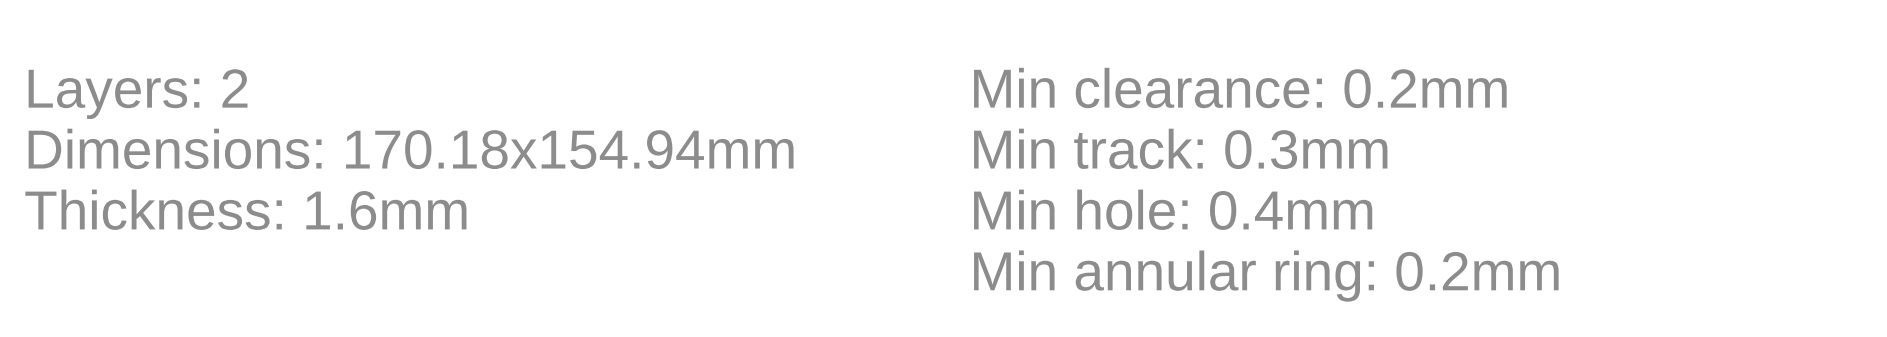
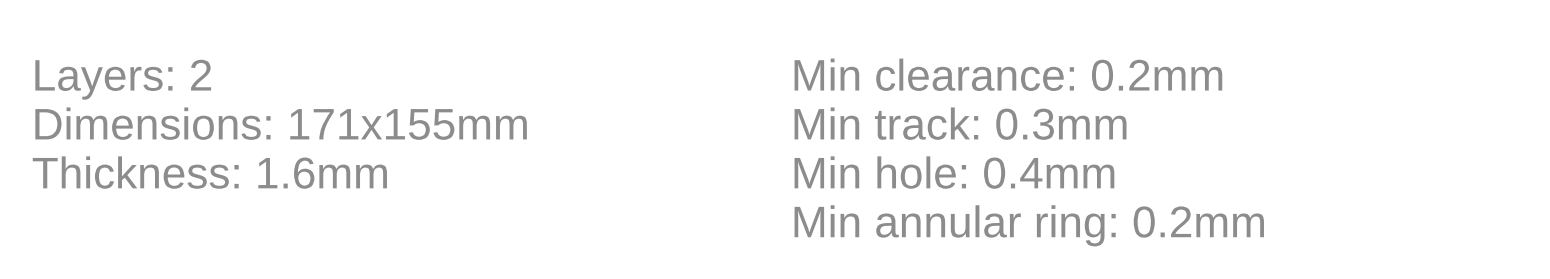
text: Dimensions: 170.18x154.94mm (411, 148) -> Dimensions: 171x155mm (281, 123)

